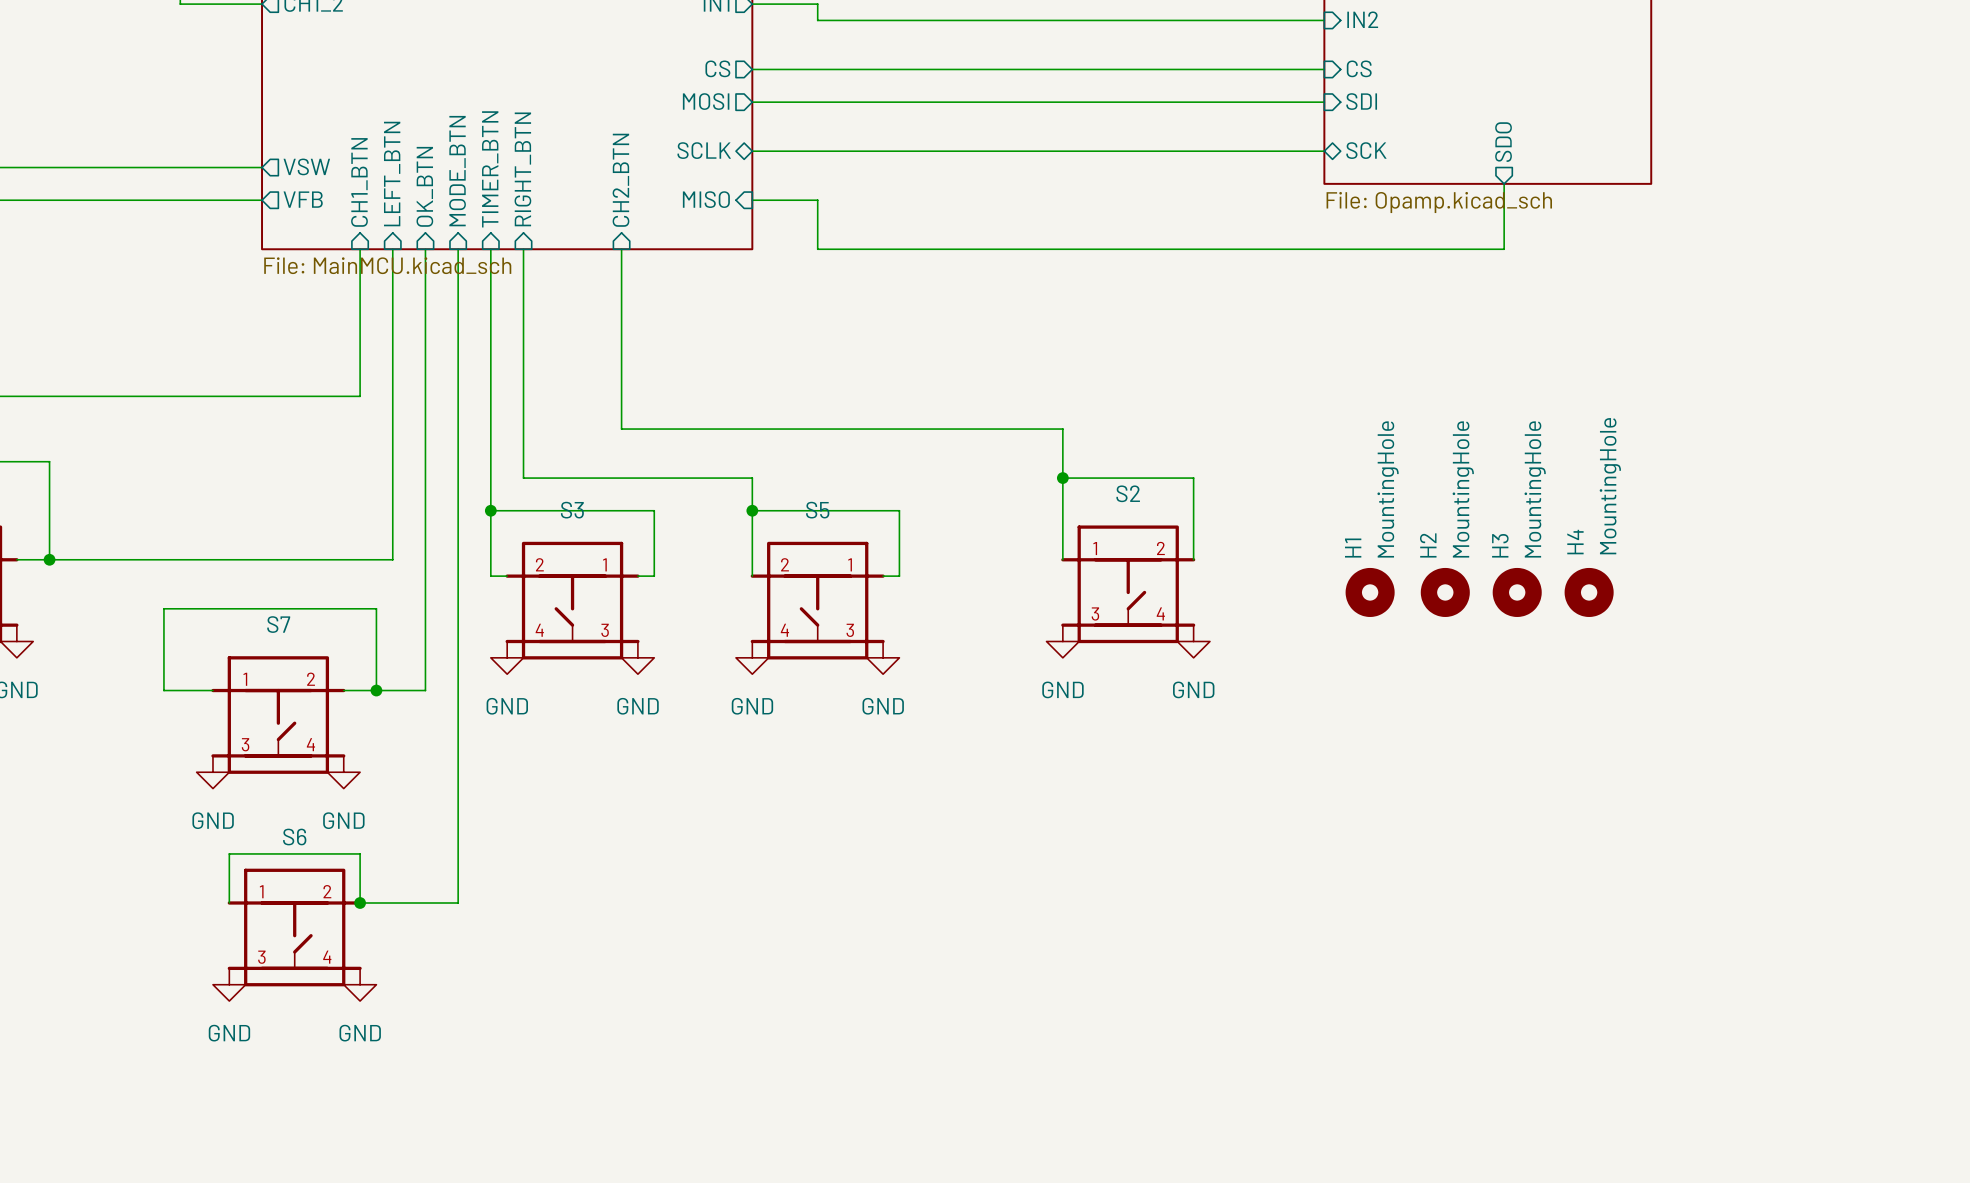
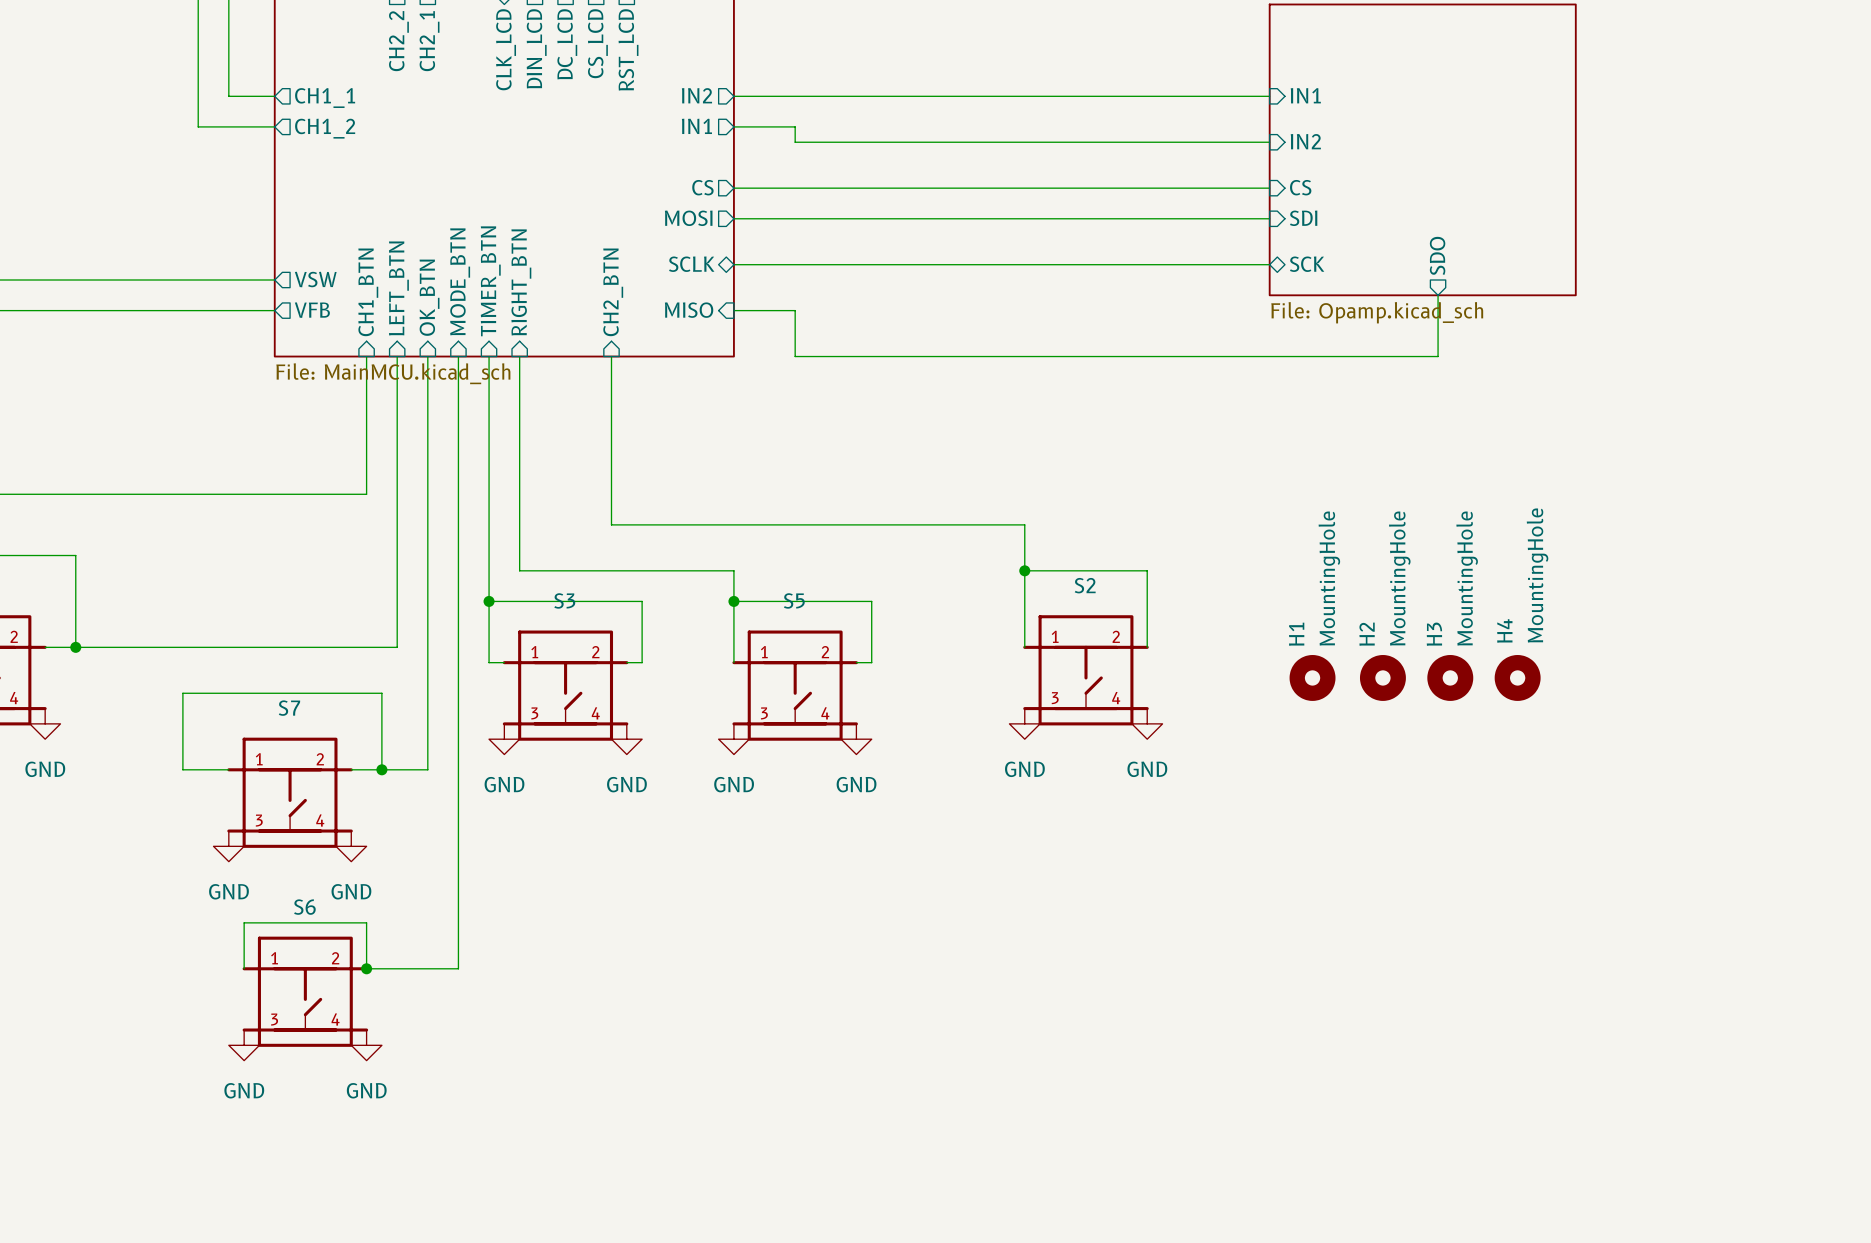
S3 flip: as is (572, 600) -> left-right (565, 685)
S5 flip: as is (817, 600) -> left-right (795, 685)

